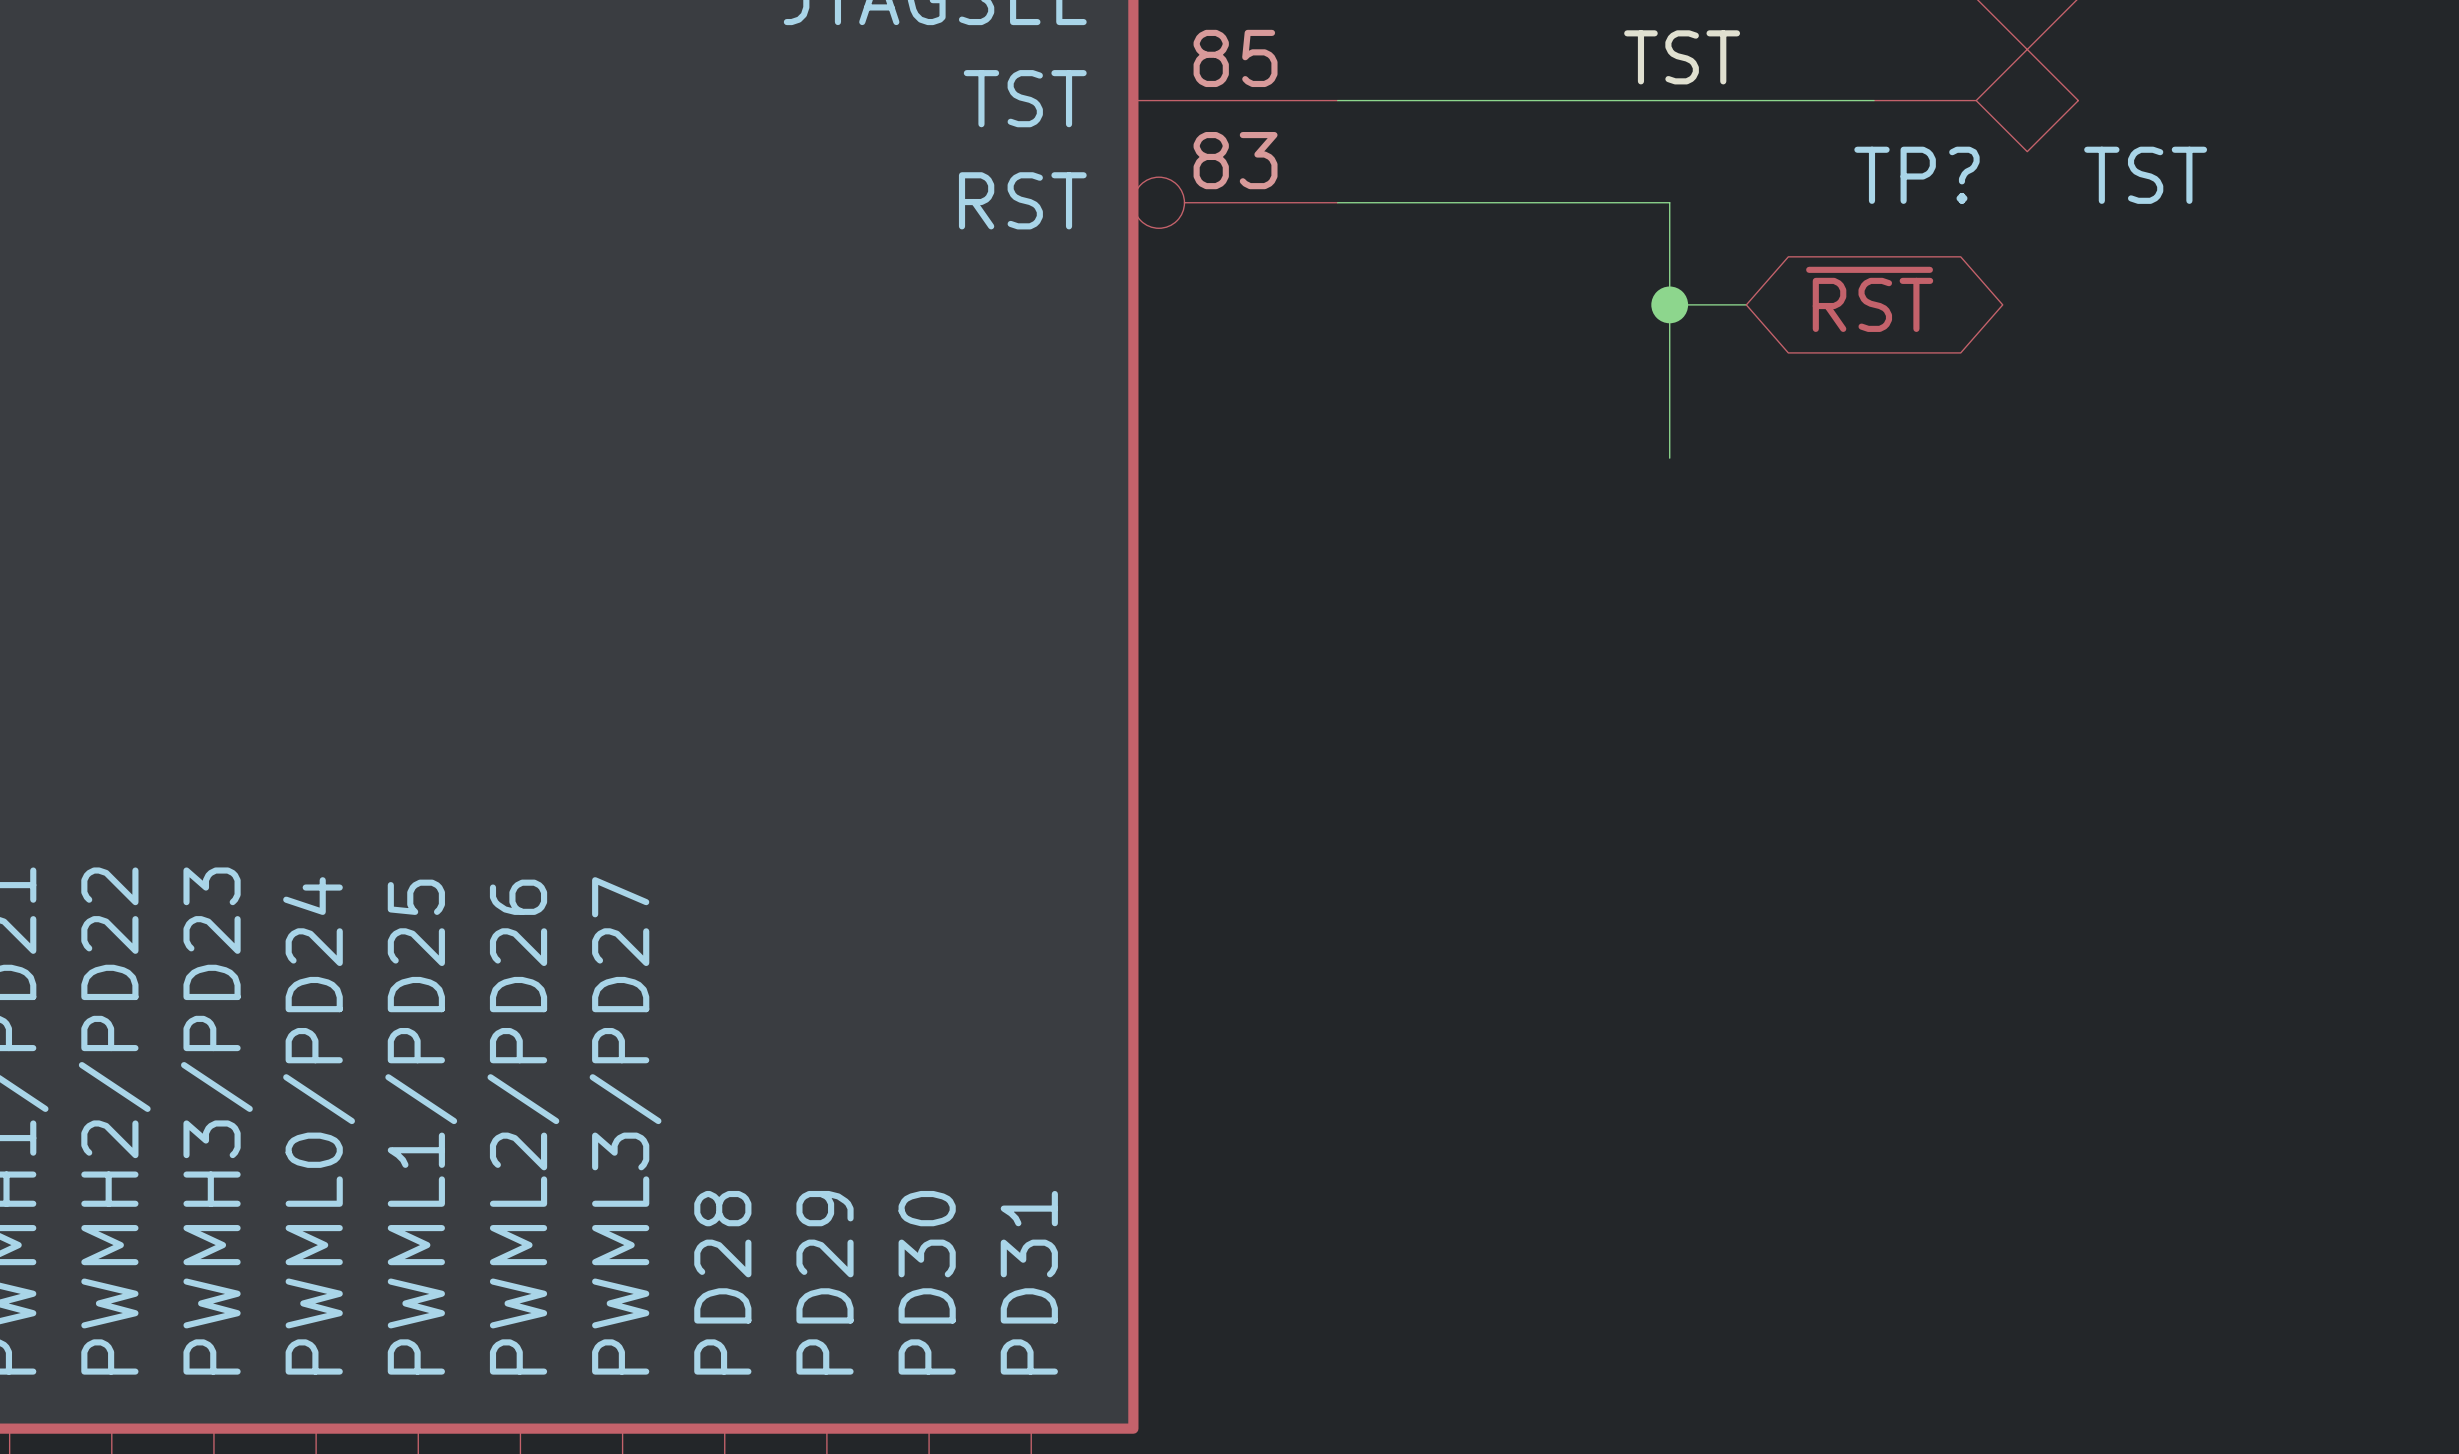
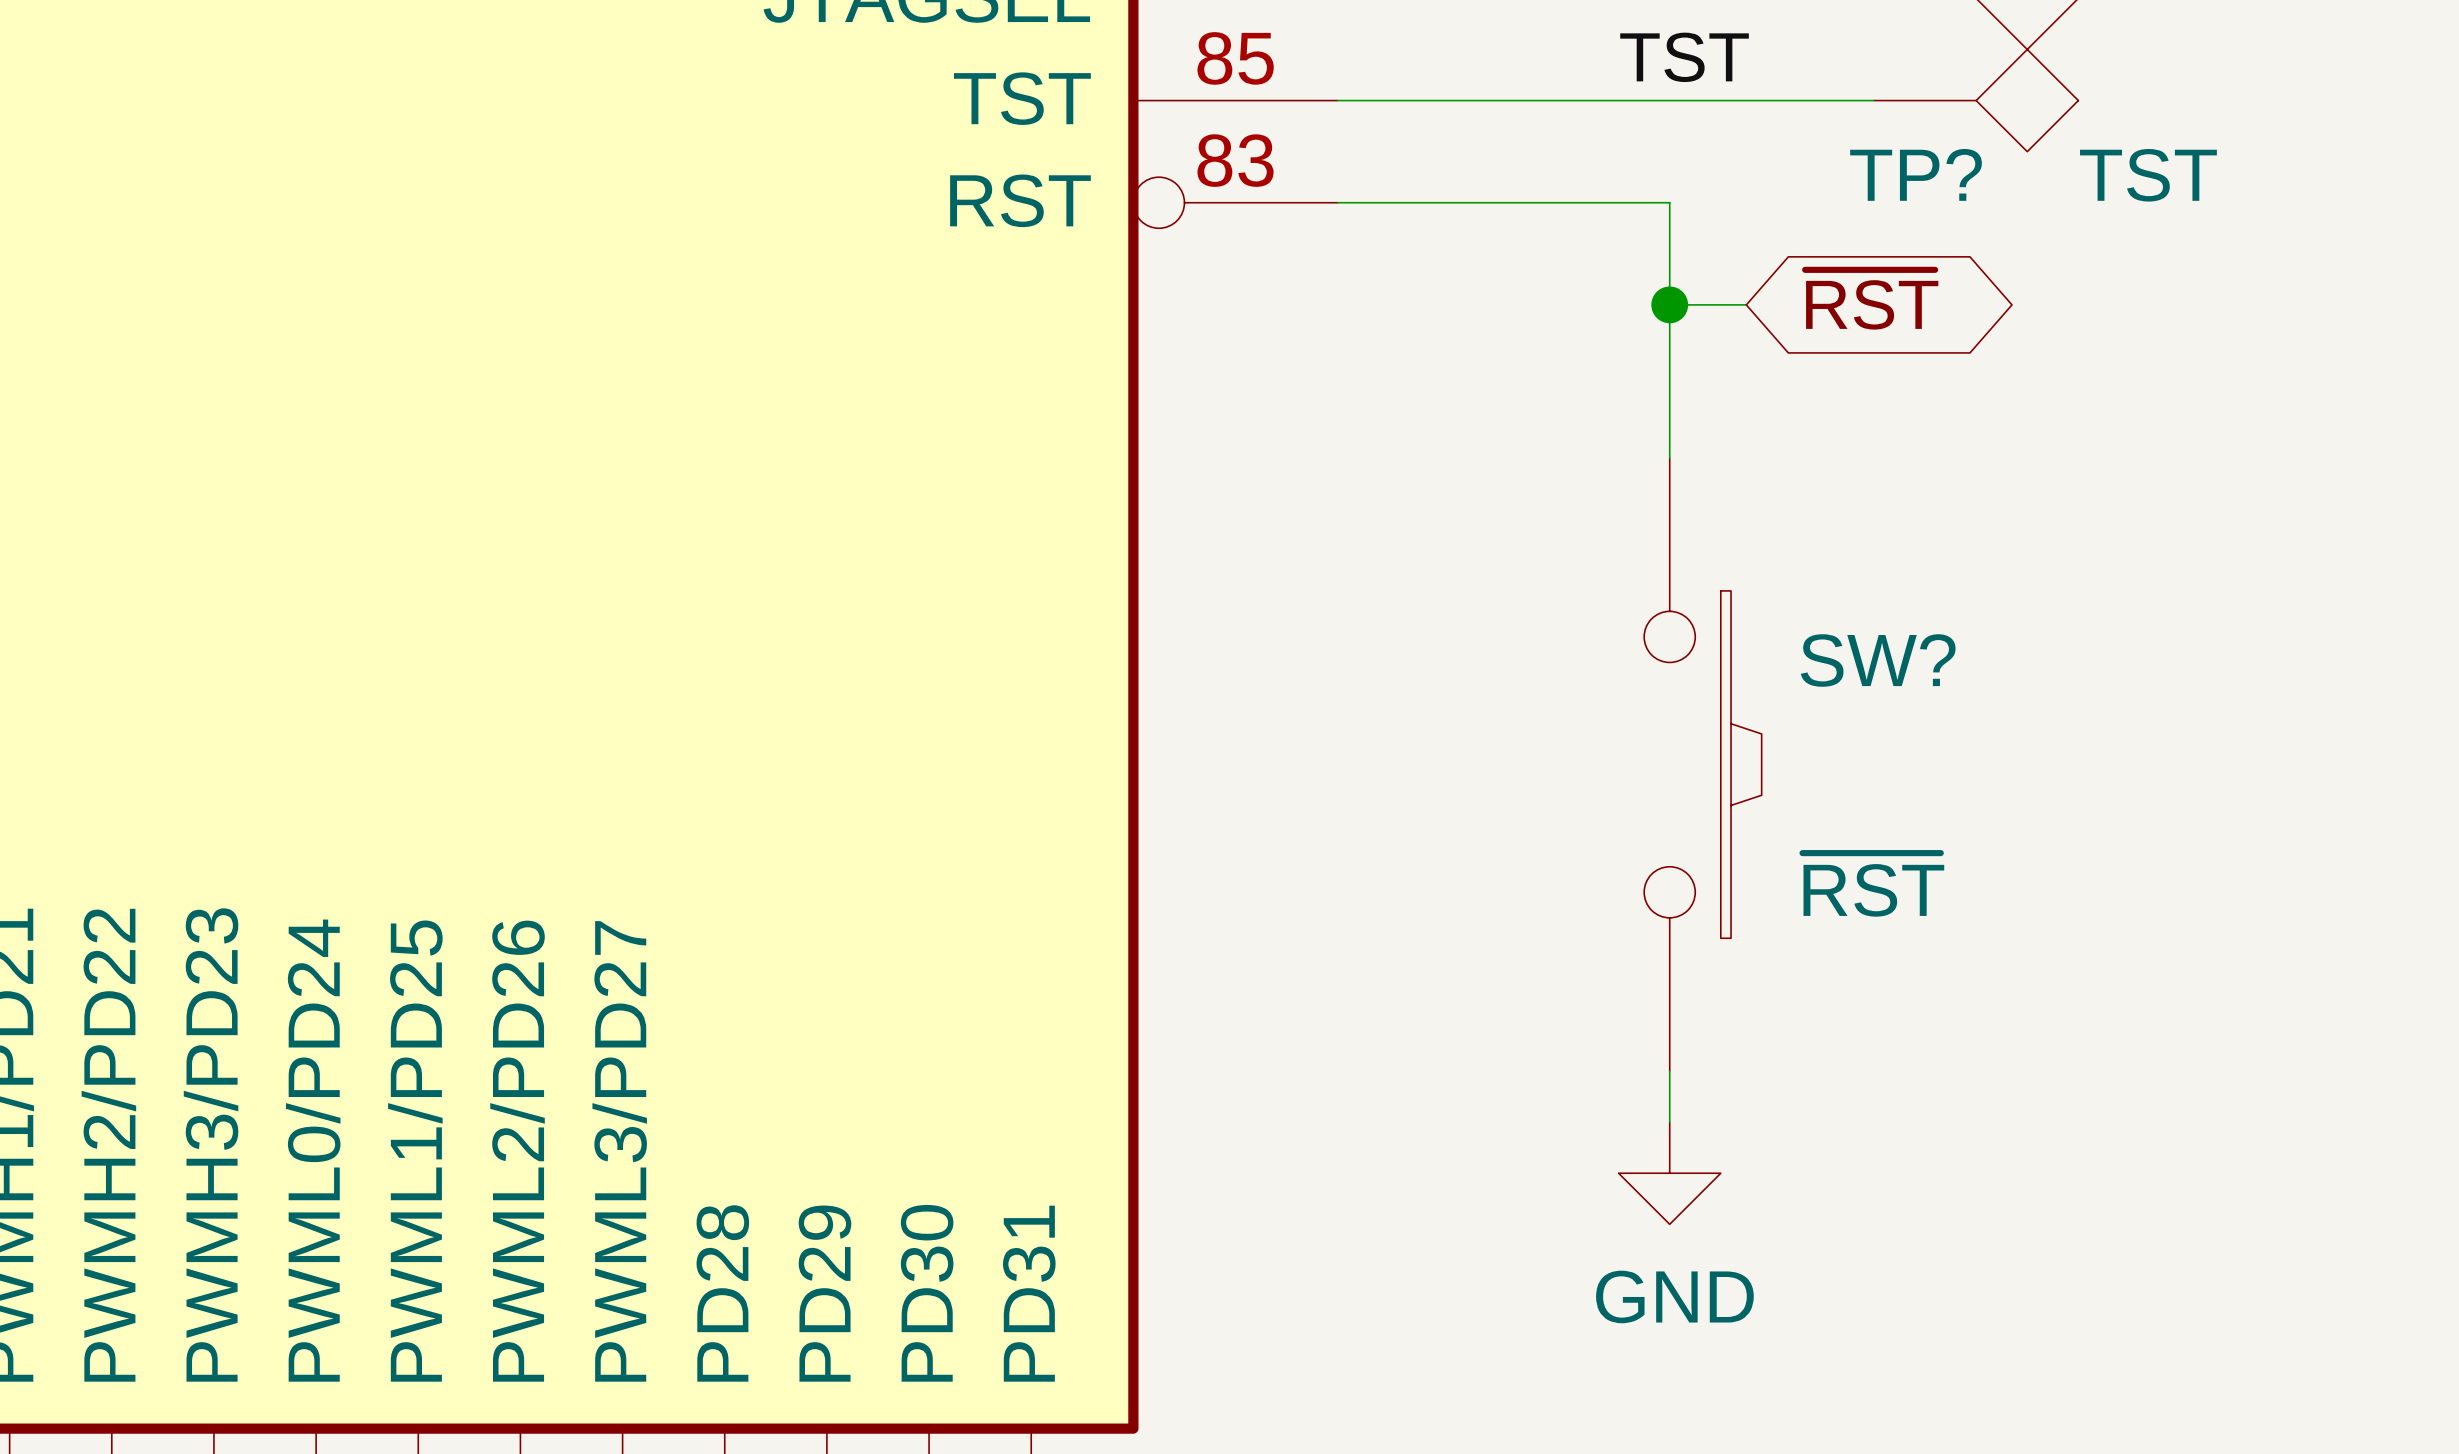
SW?: none -> ~{RST} (1702, 764)
wire: none -> (1669, 1071) (1669, 1122)
power symbol: none -> GND (1669, 1173)

